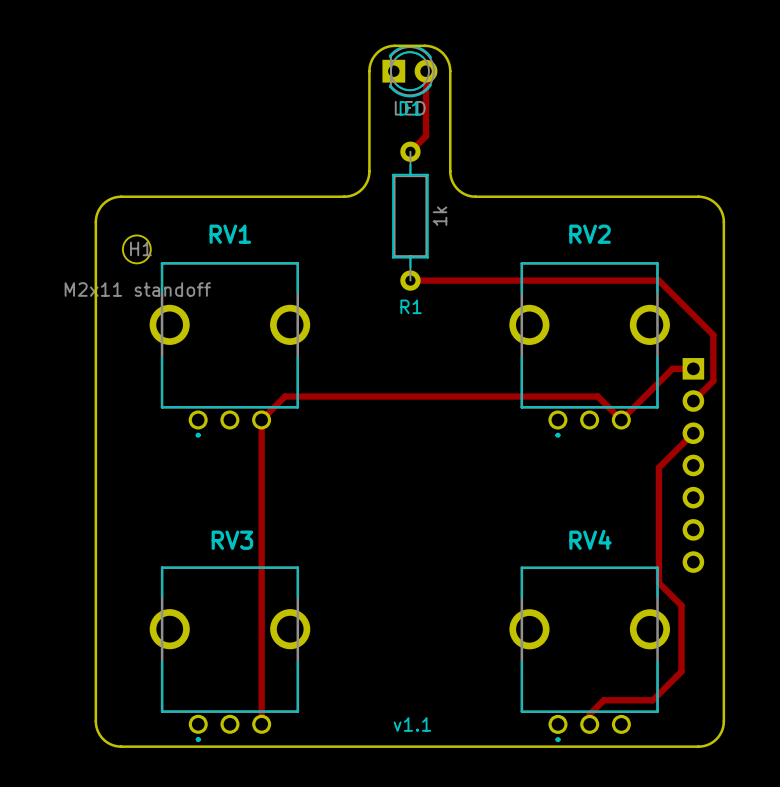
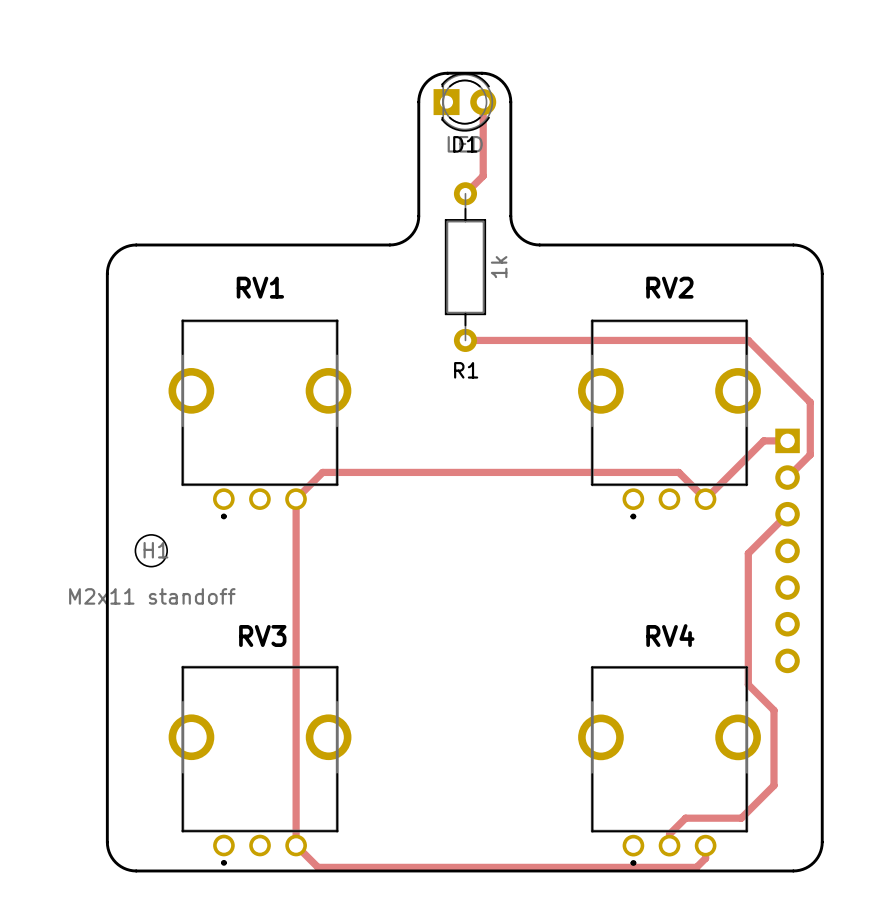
H1 position: (136, 249) -> (151, 550)
track: none -> (296, 845) (317, 867) (696, 867) (705, 858) (705, 845)
text: v1.1 (412, 724) -> none

